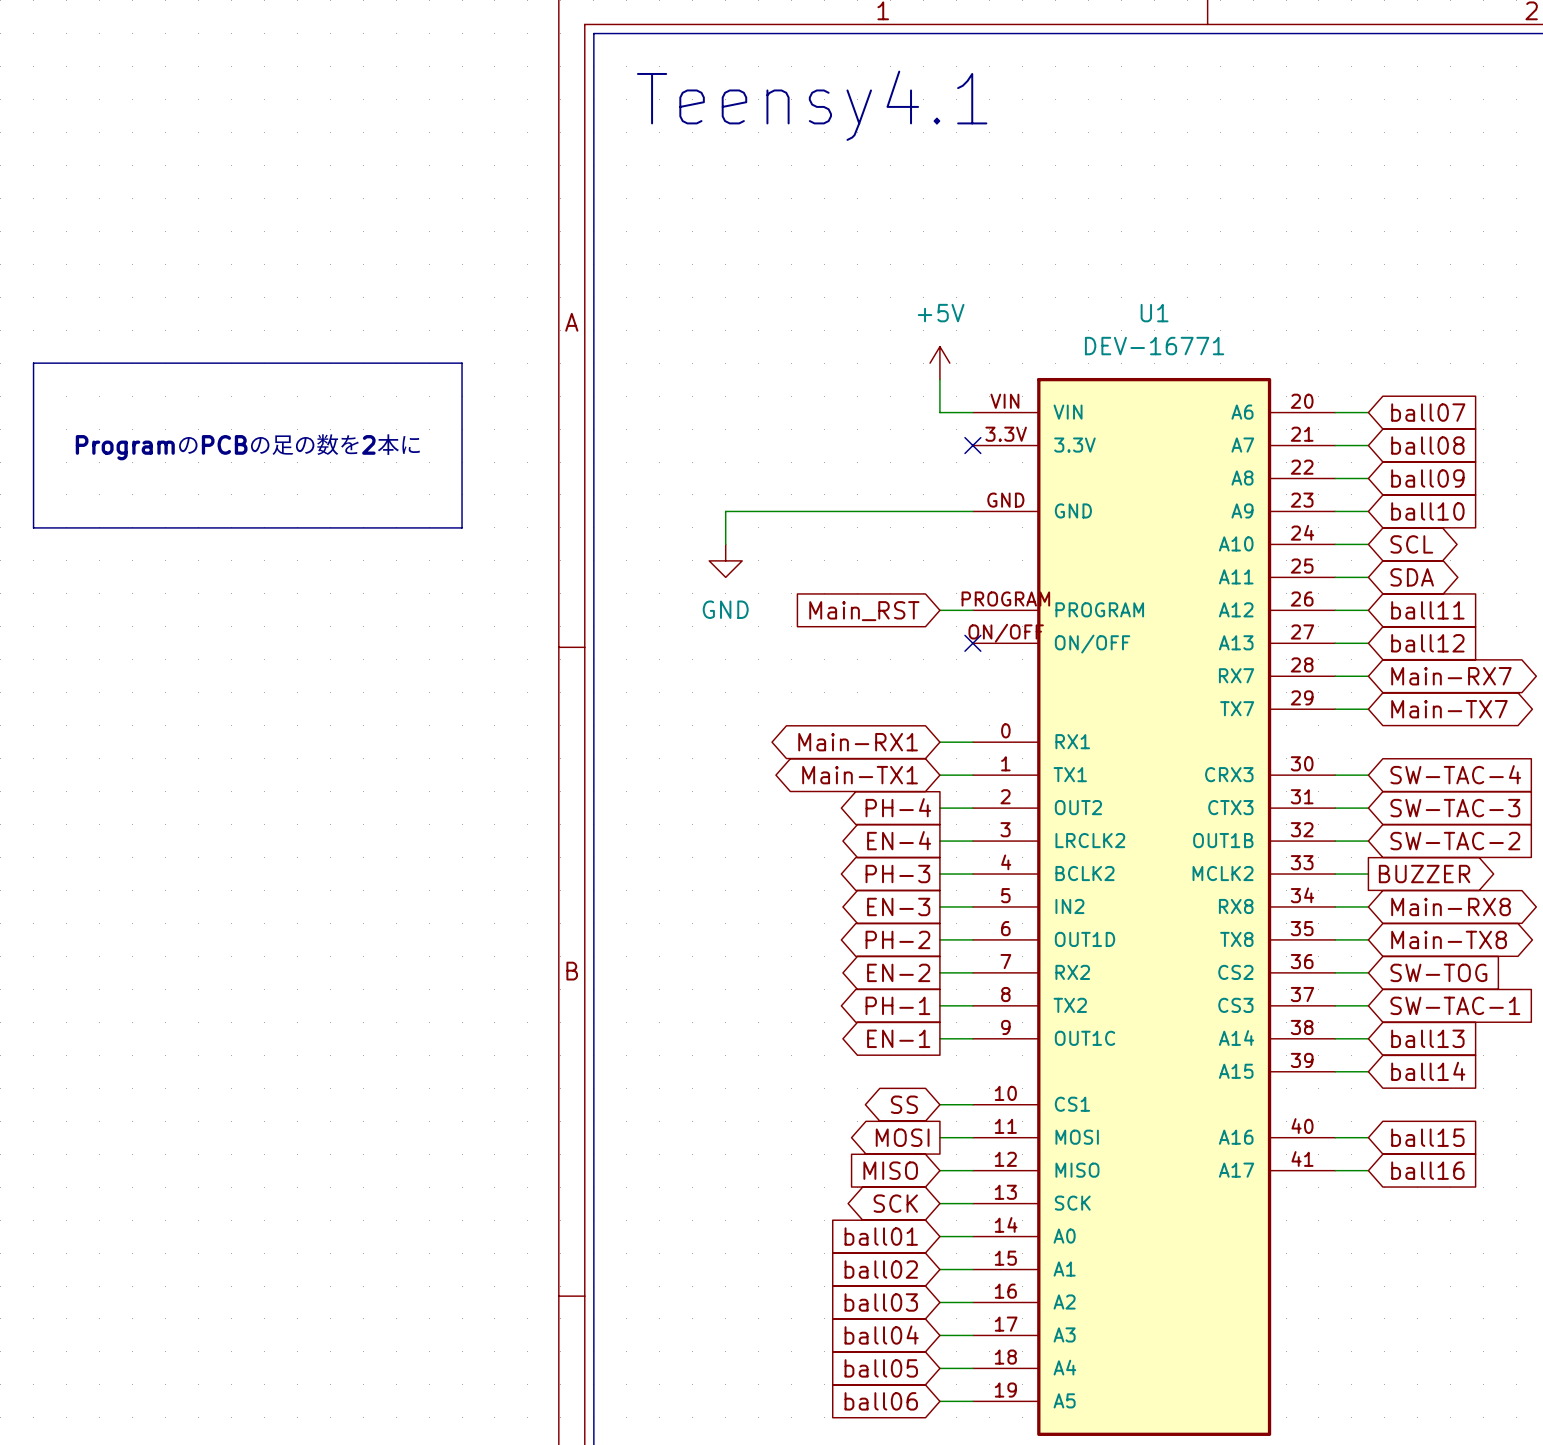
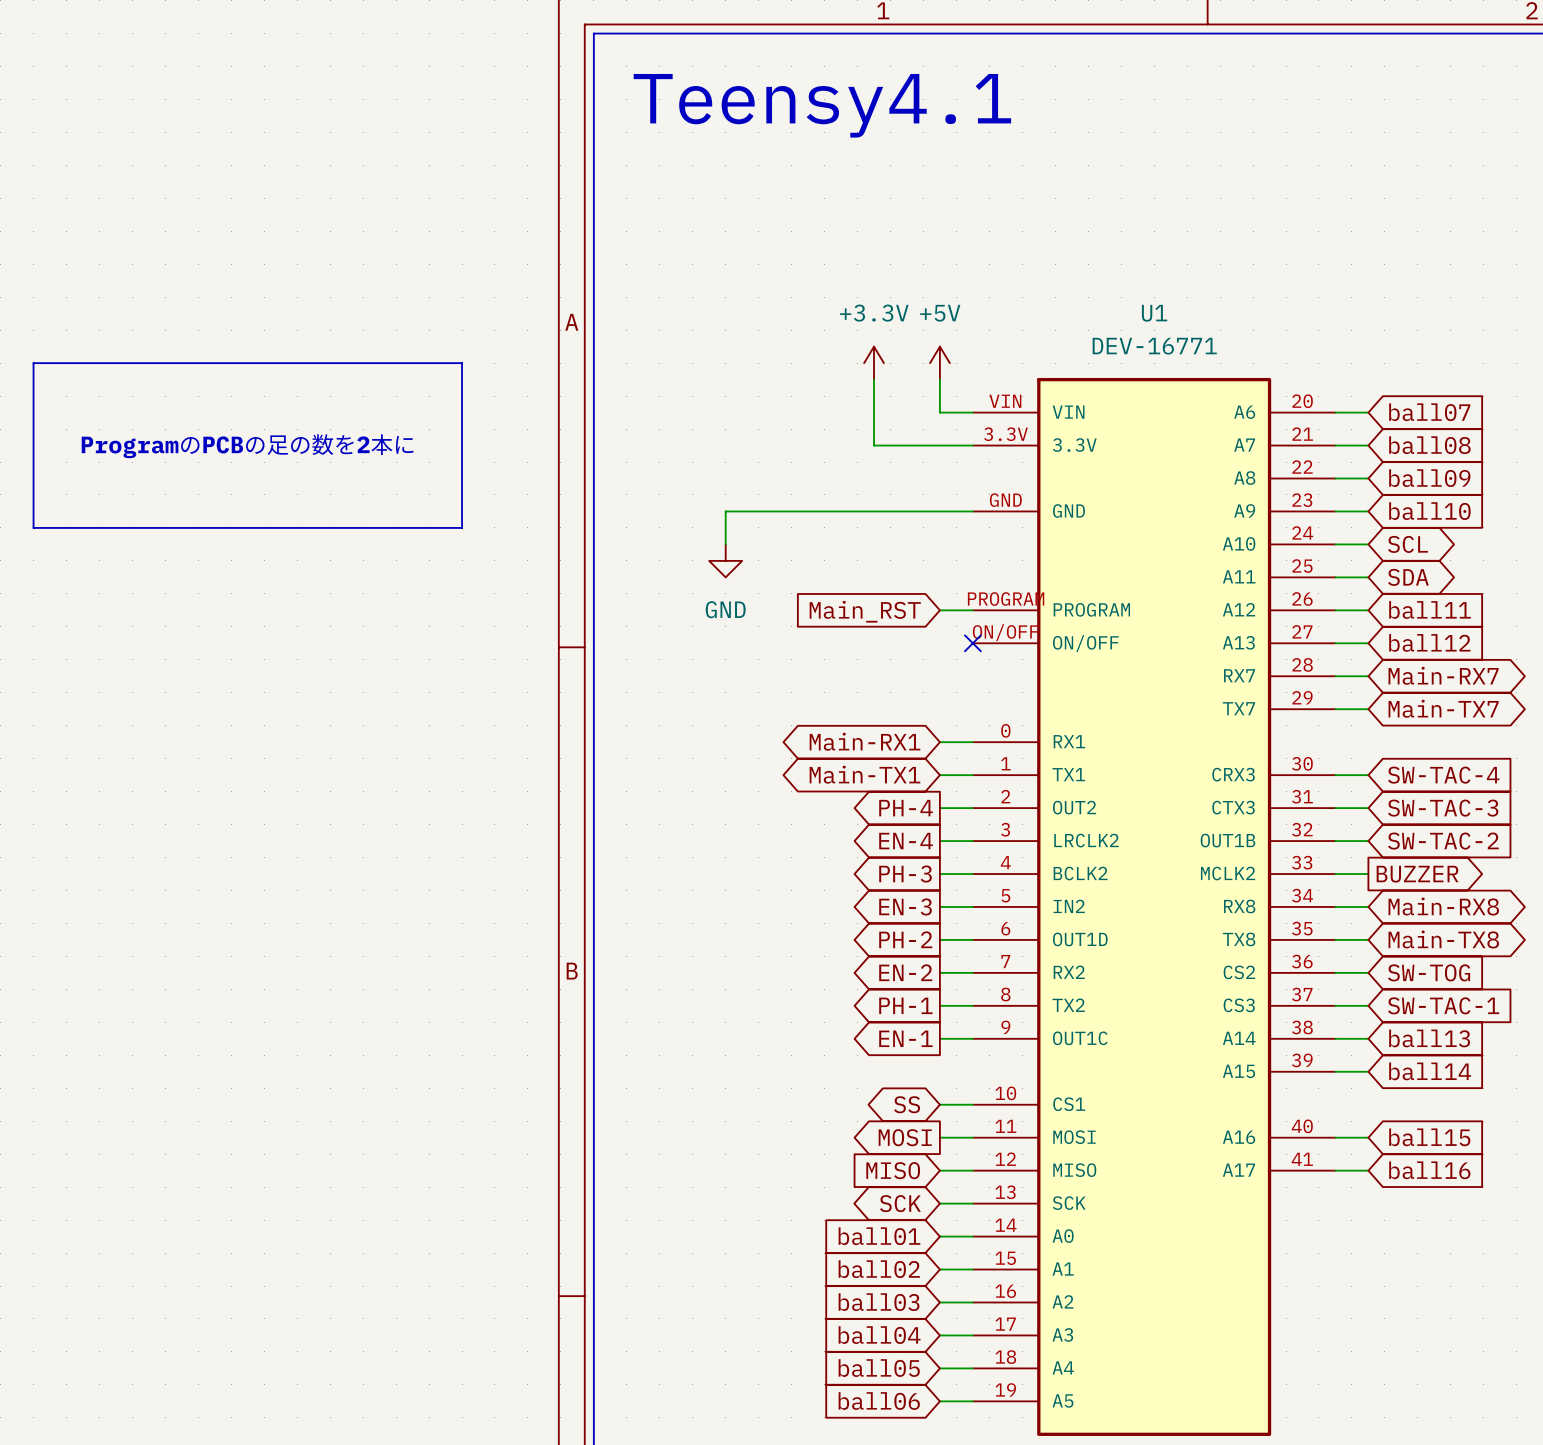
power symbol: none -> +3.3V (874, 363)
wire: none -> (874, 379) (874, 445) (972, 445)
no-connect mark: (972, 445) -> none

